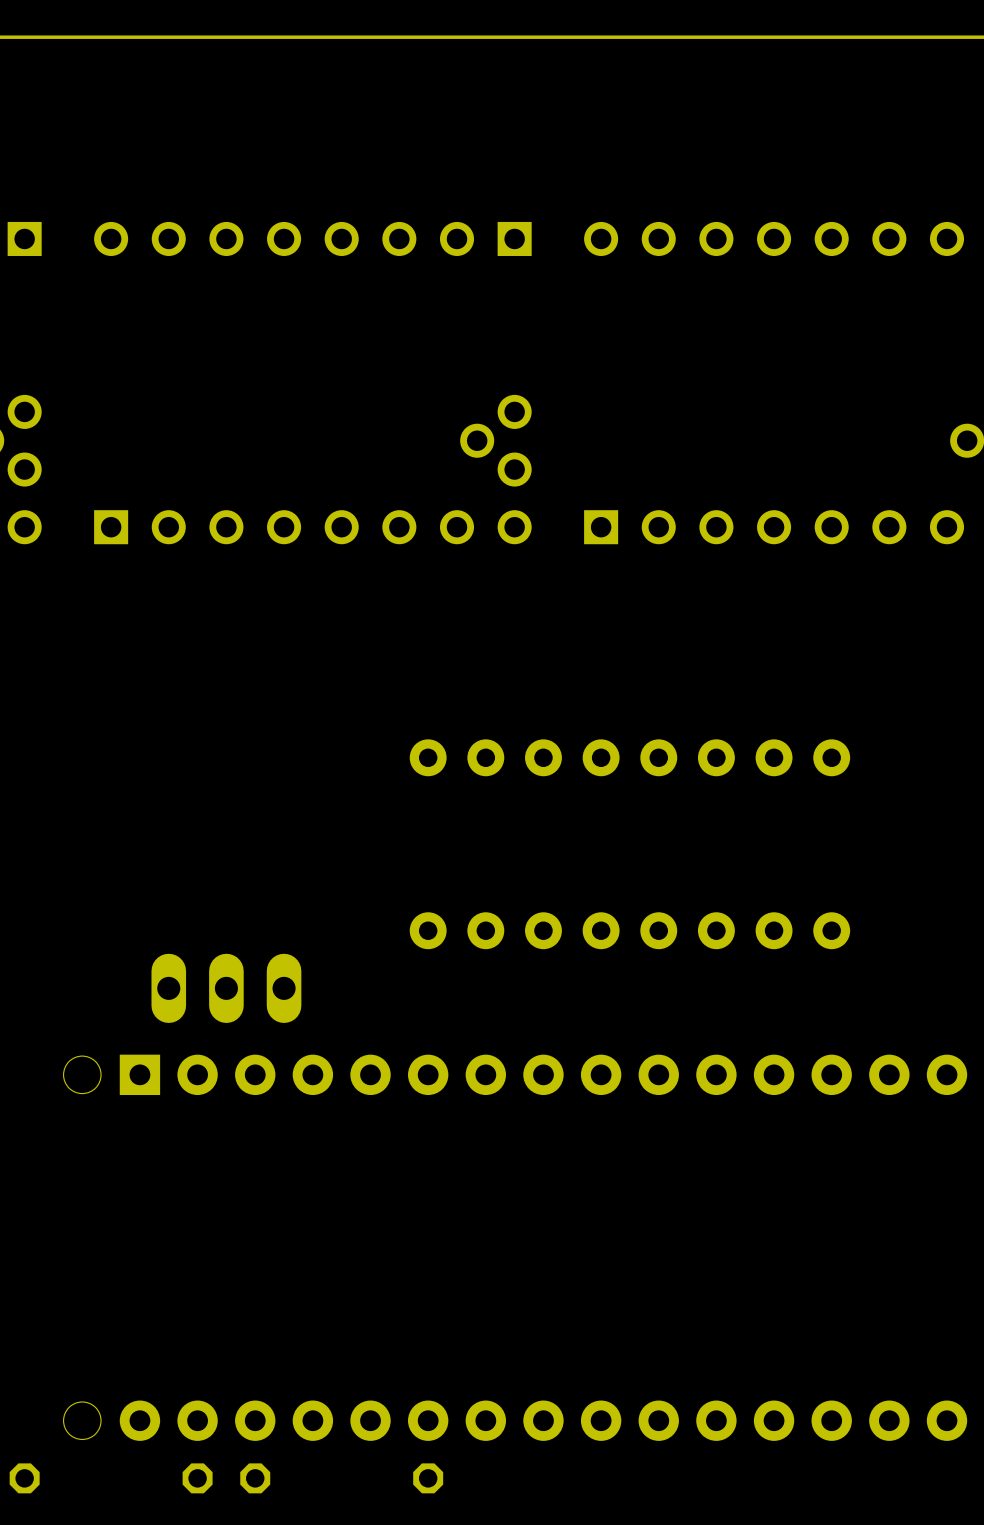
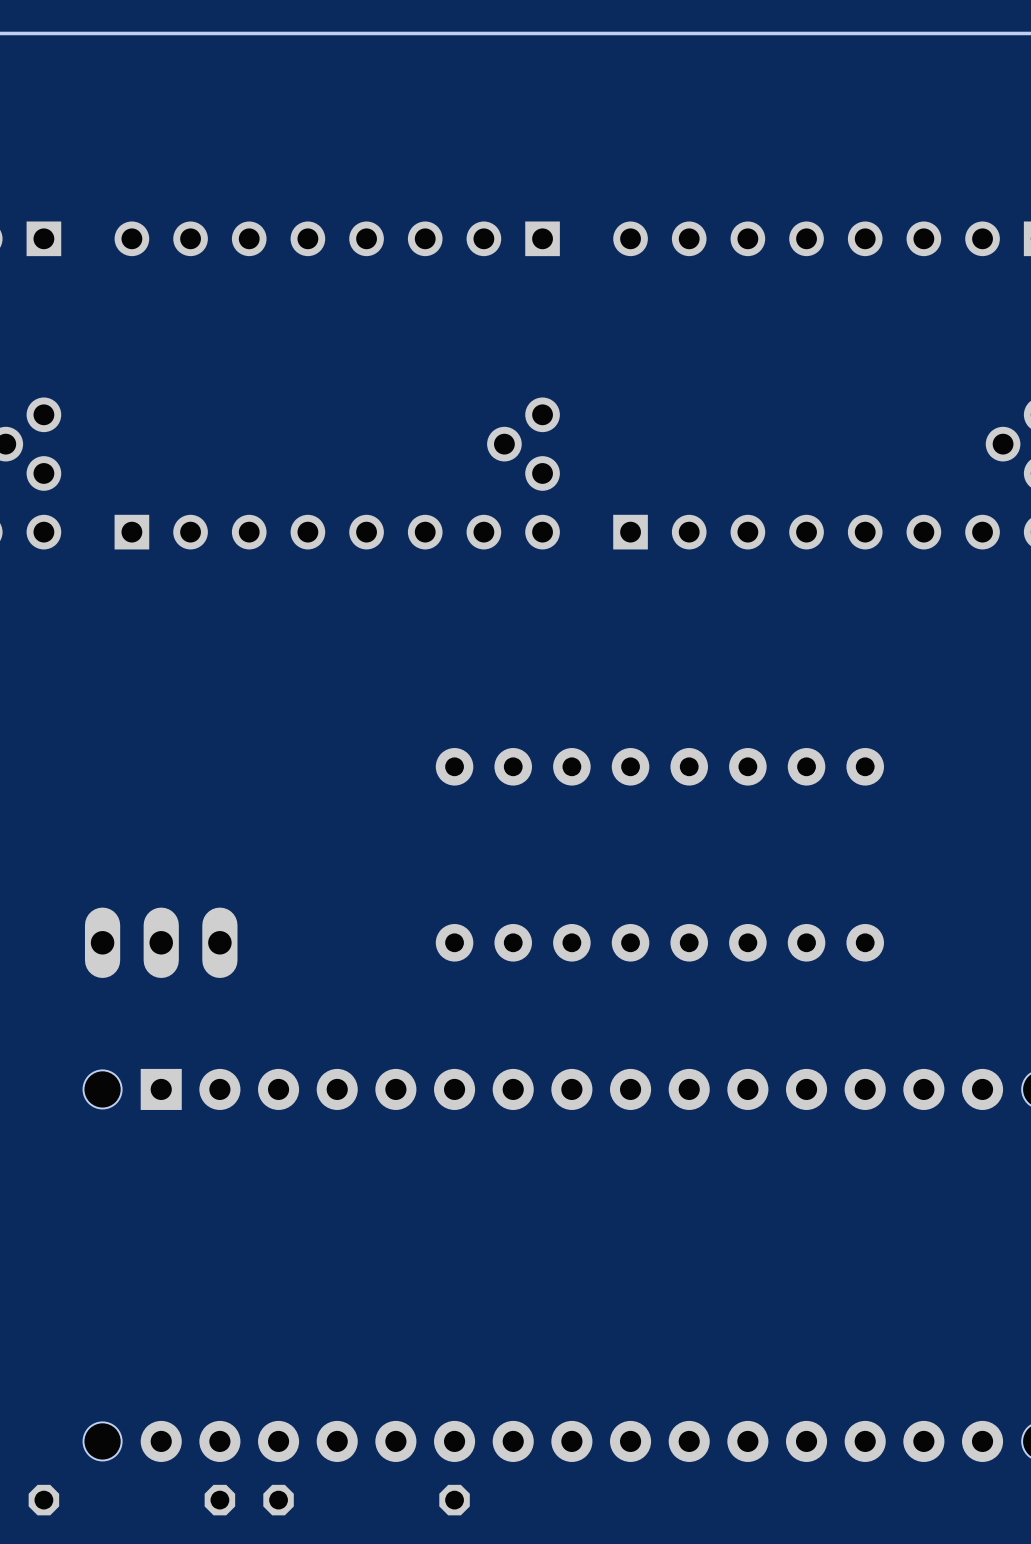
part position: (226, 988) -> (161, 942)

